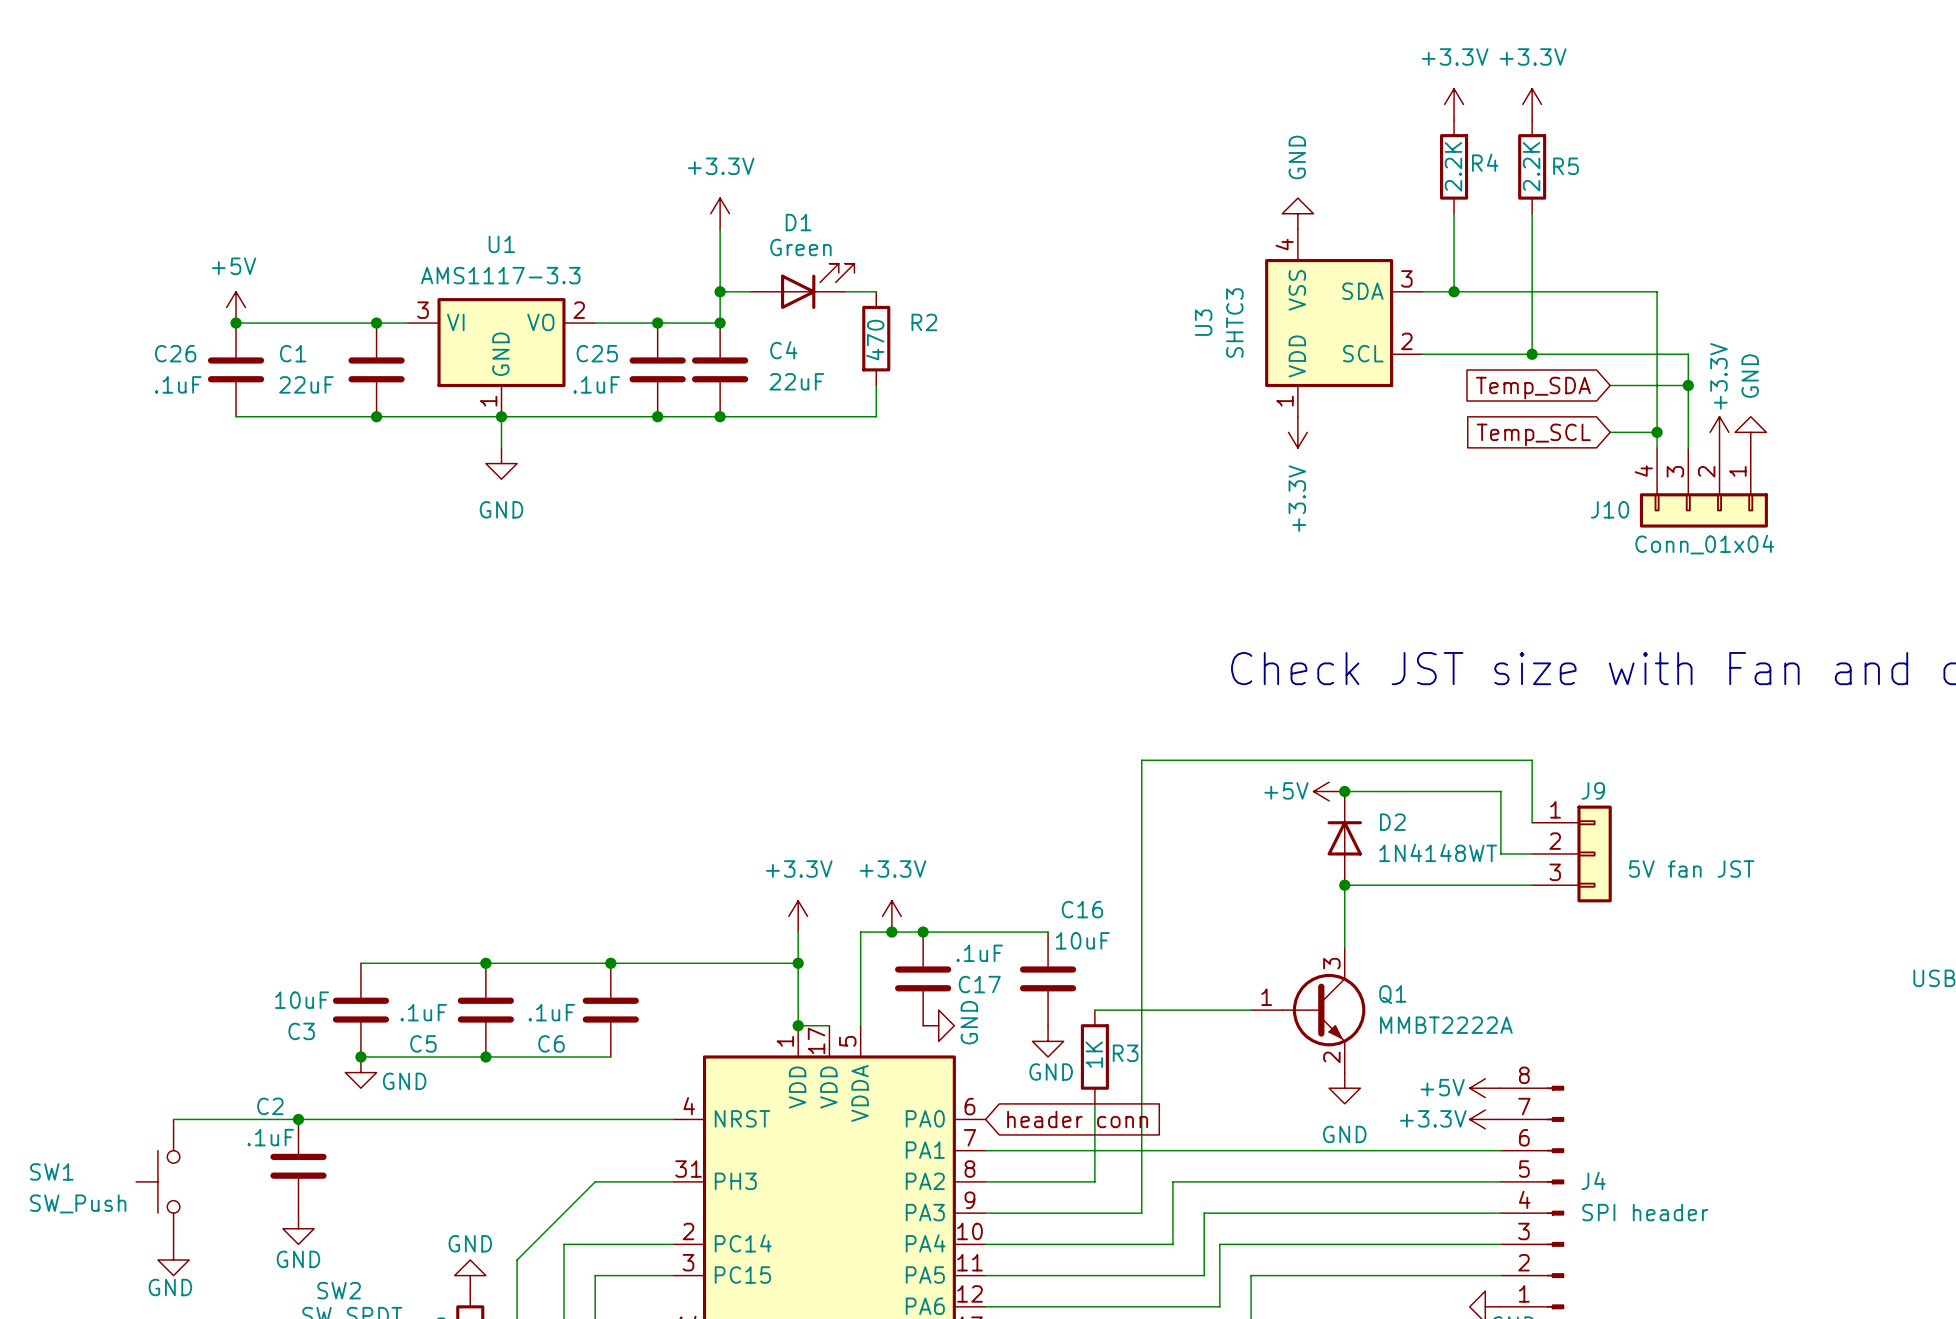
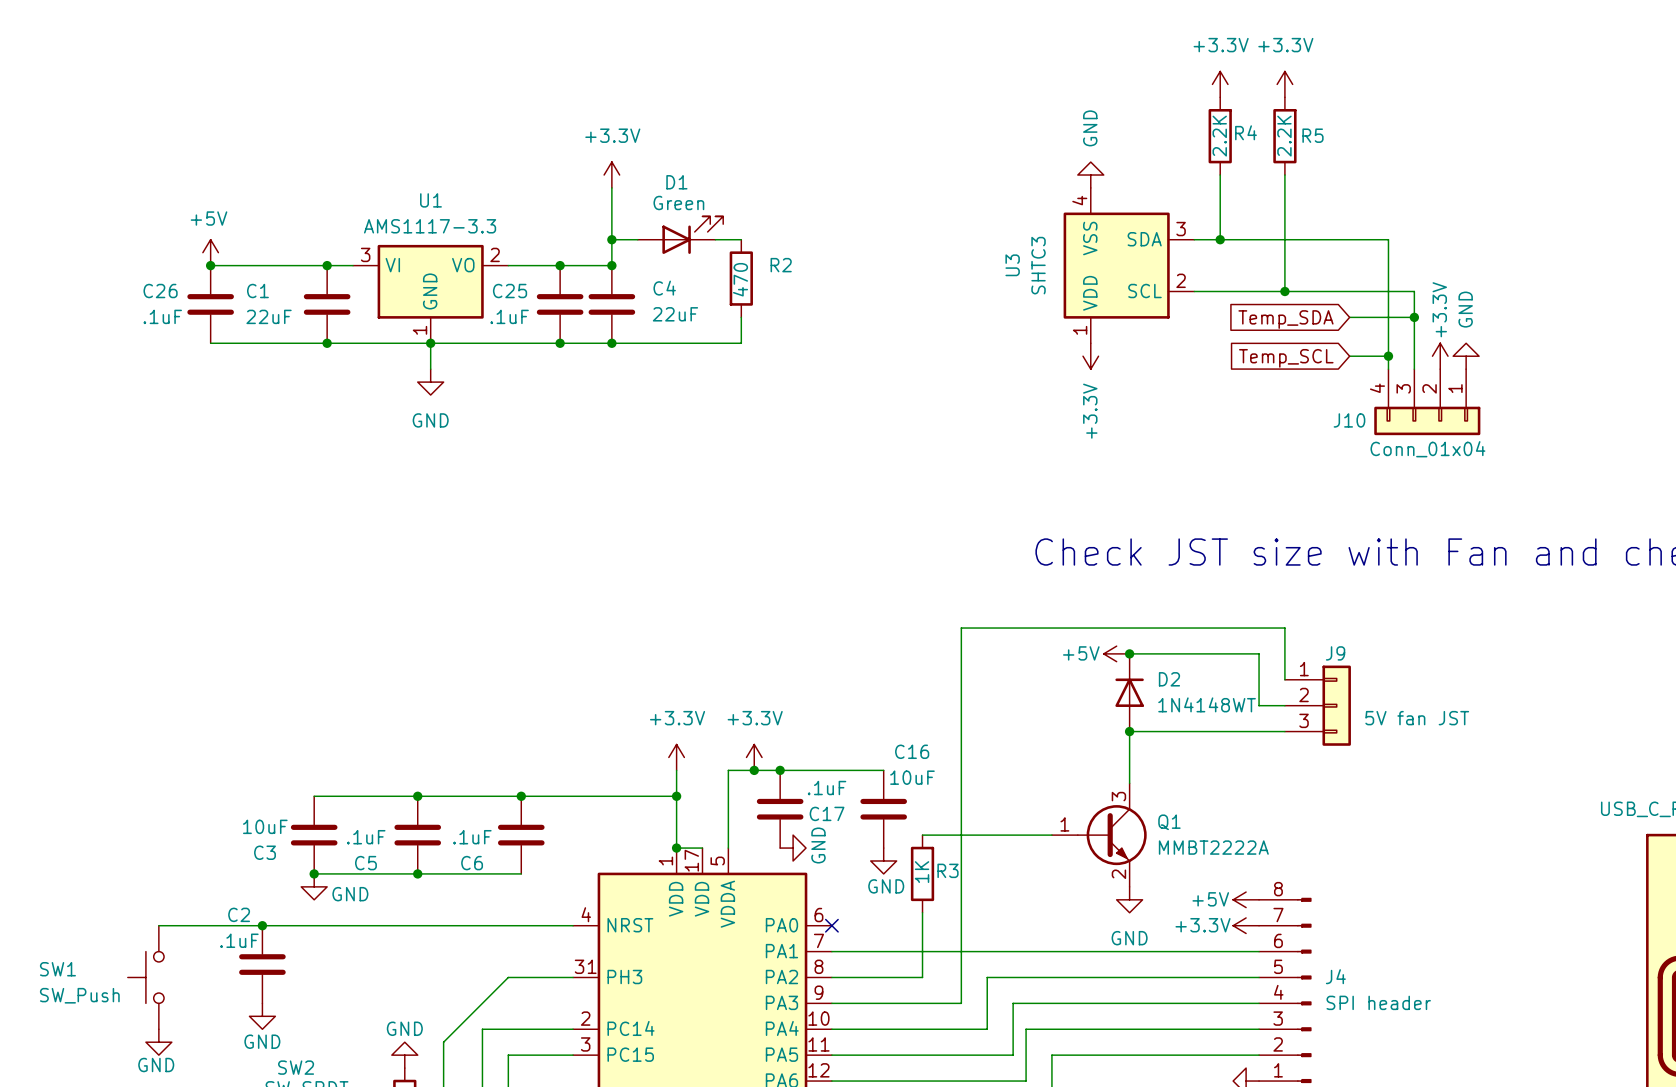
no-connect mark: none -> (831, 925)
global label: header conn (1077, 1119) -> none

